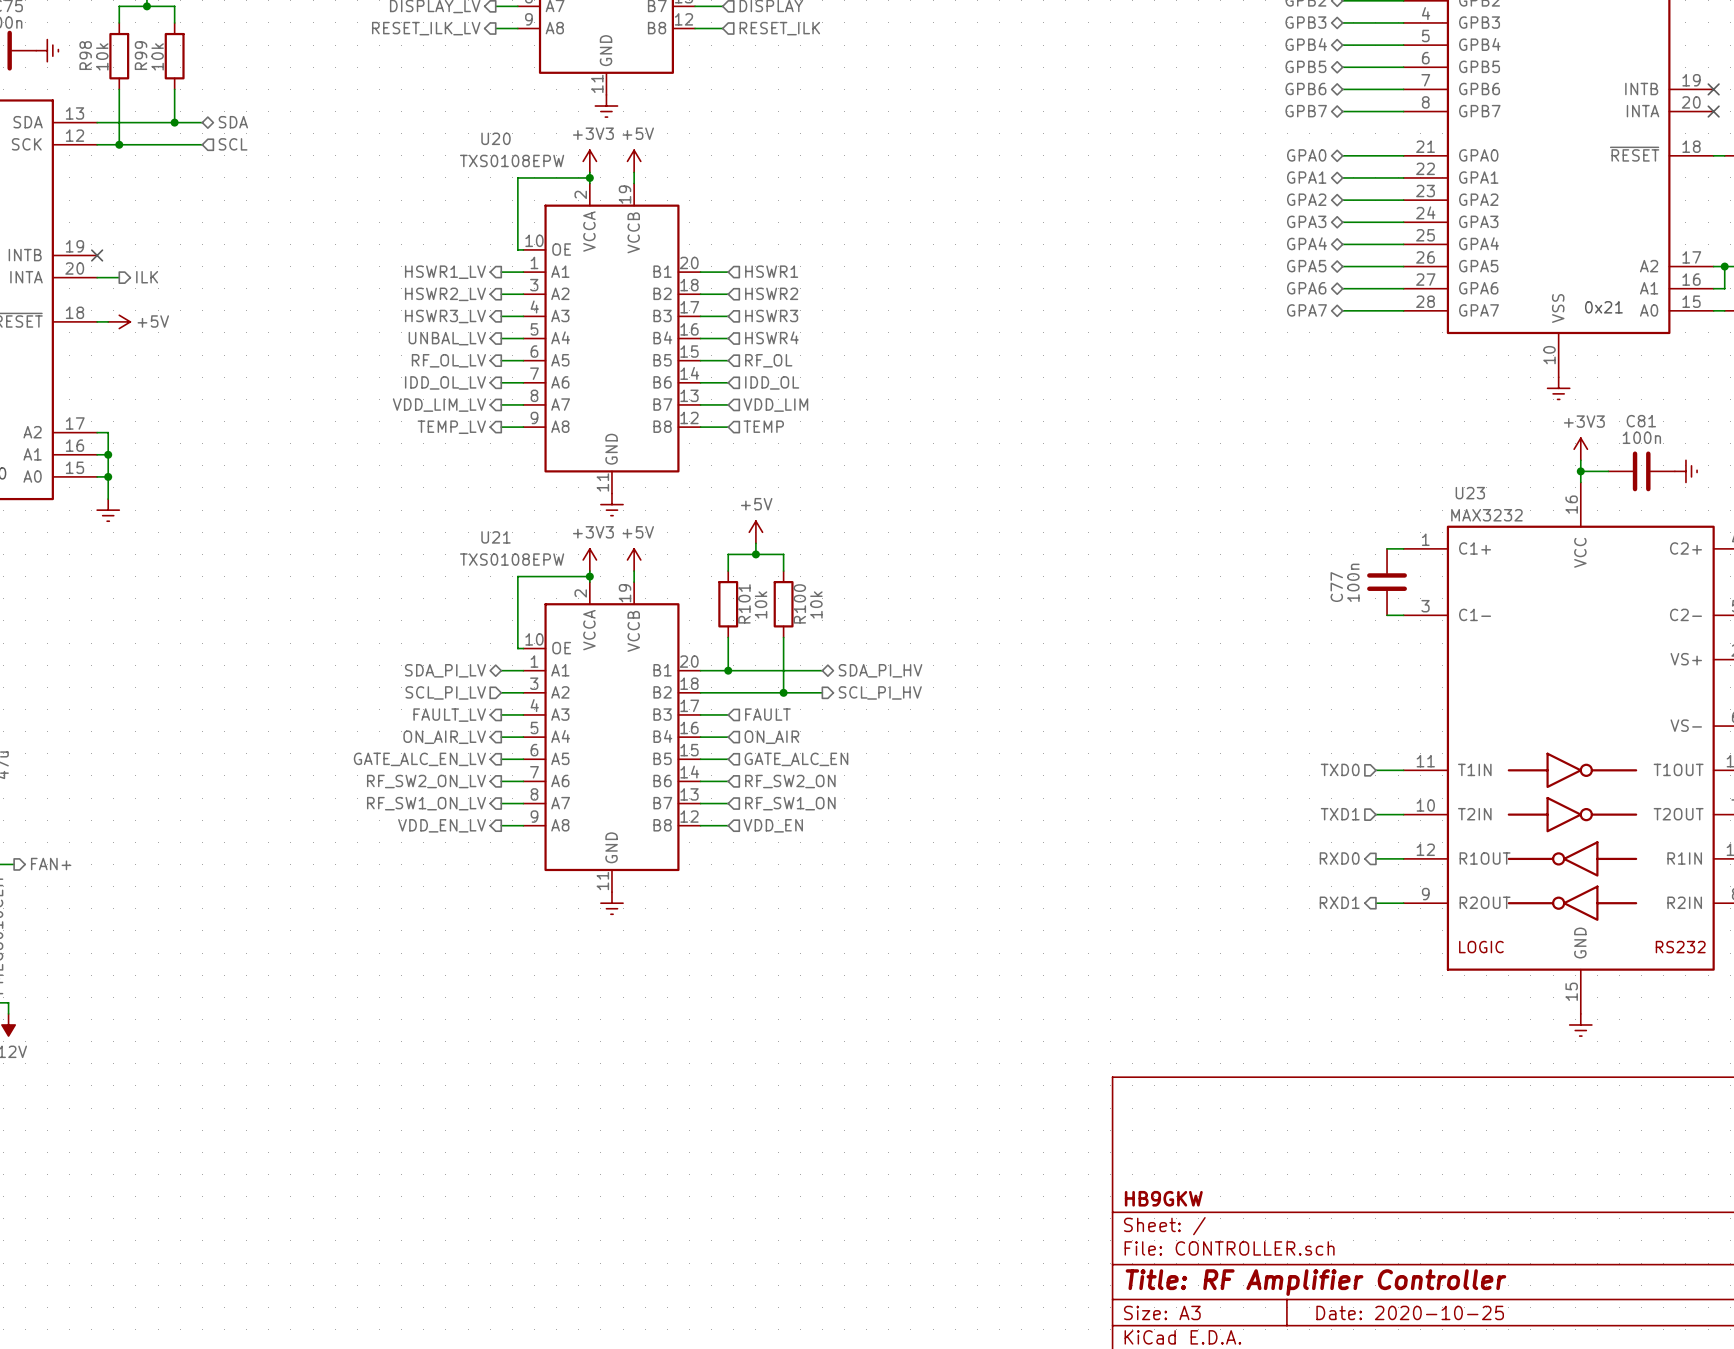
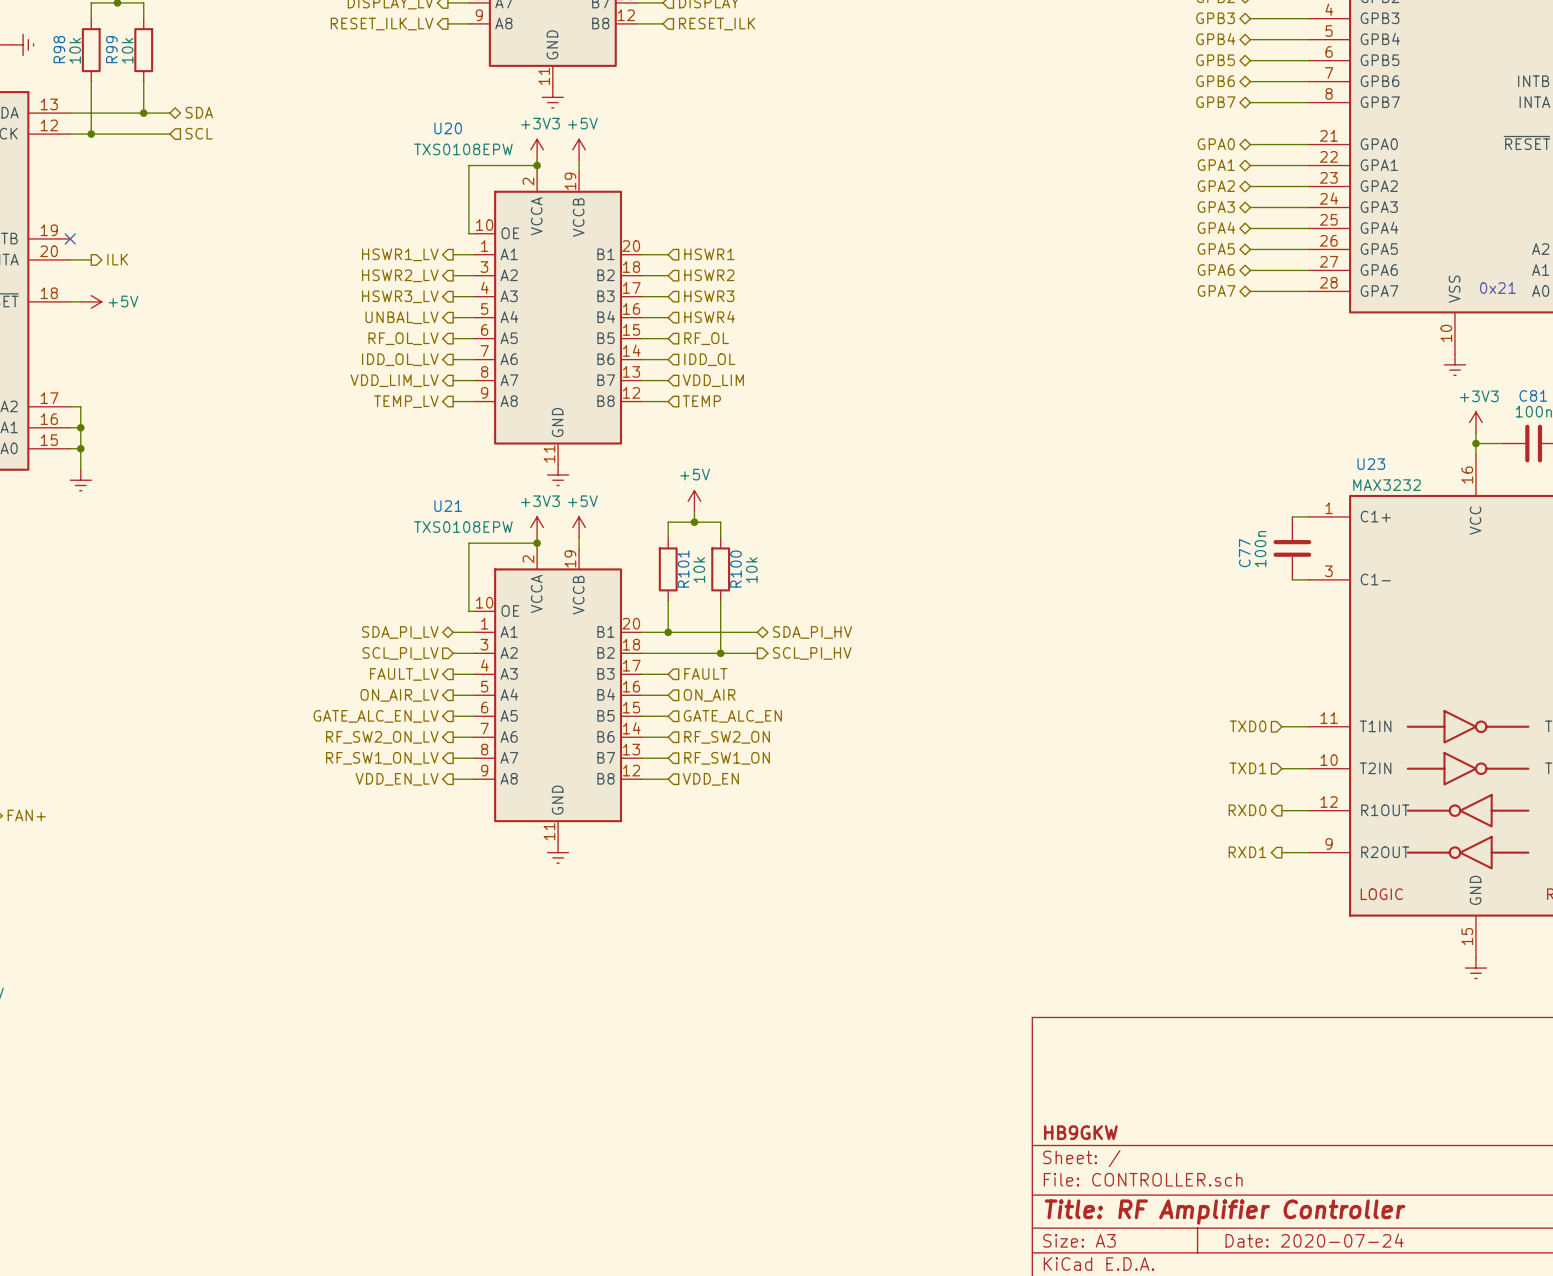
title block: Date: 2020-10-25 (1410, 1312) -> Date: 2020-07-24 (1314, 1240)

